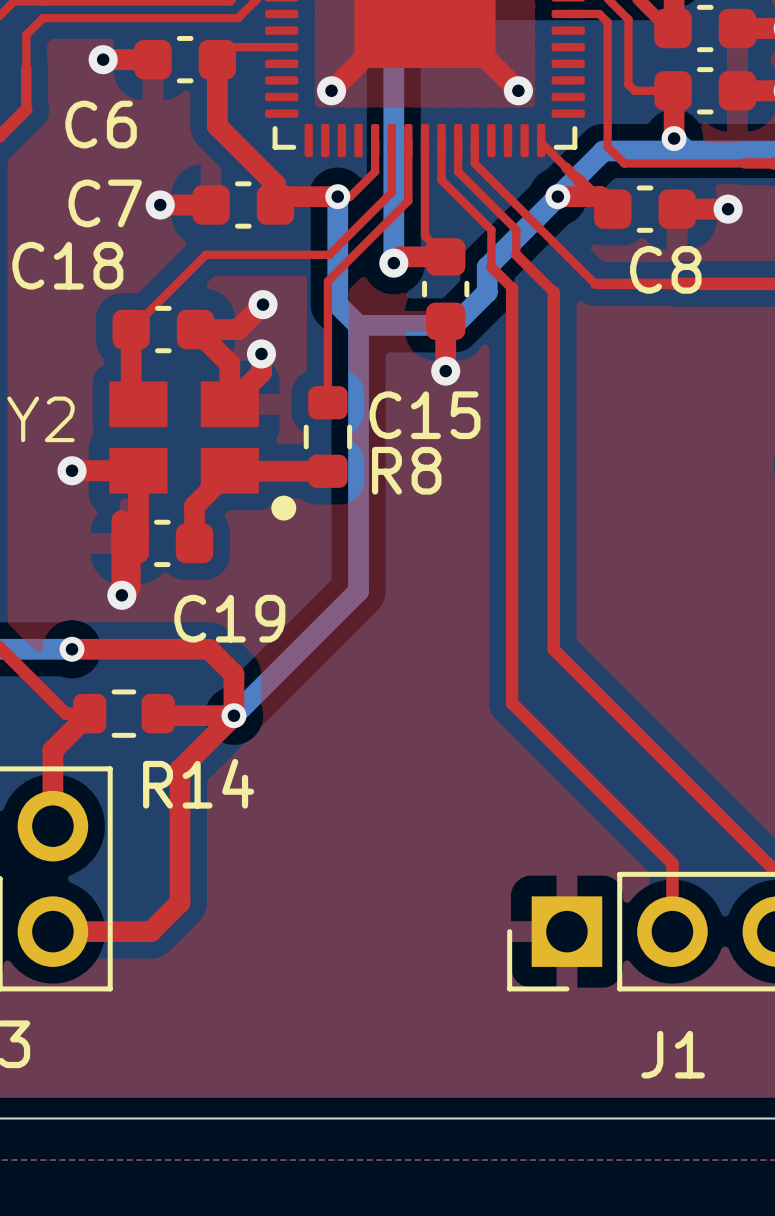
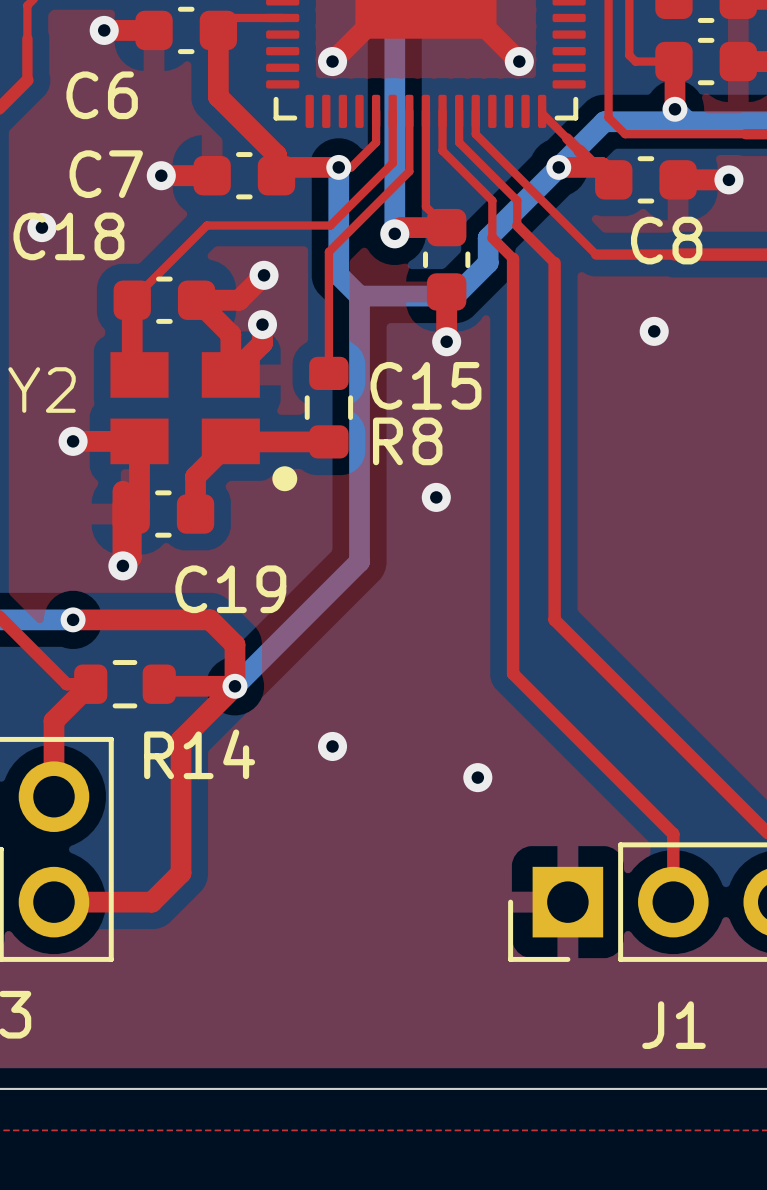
via: none -> (41, 227)
via: none -> (654, 331)
via: none -> (436, 497)
via: none -> (332, 746)
via: none -> (477, 777)

